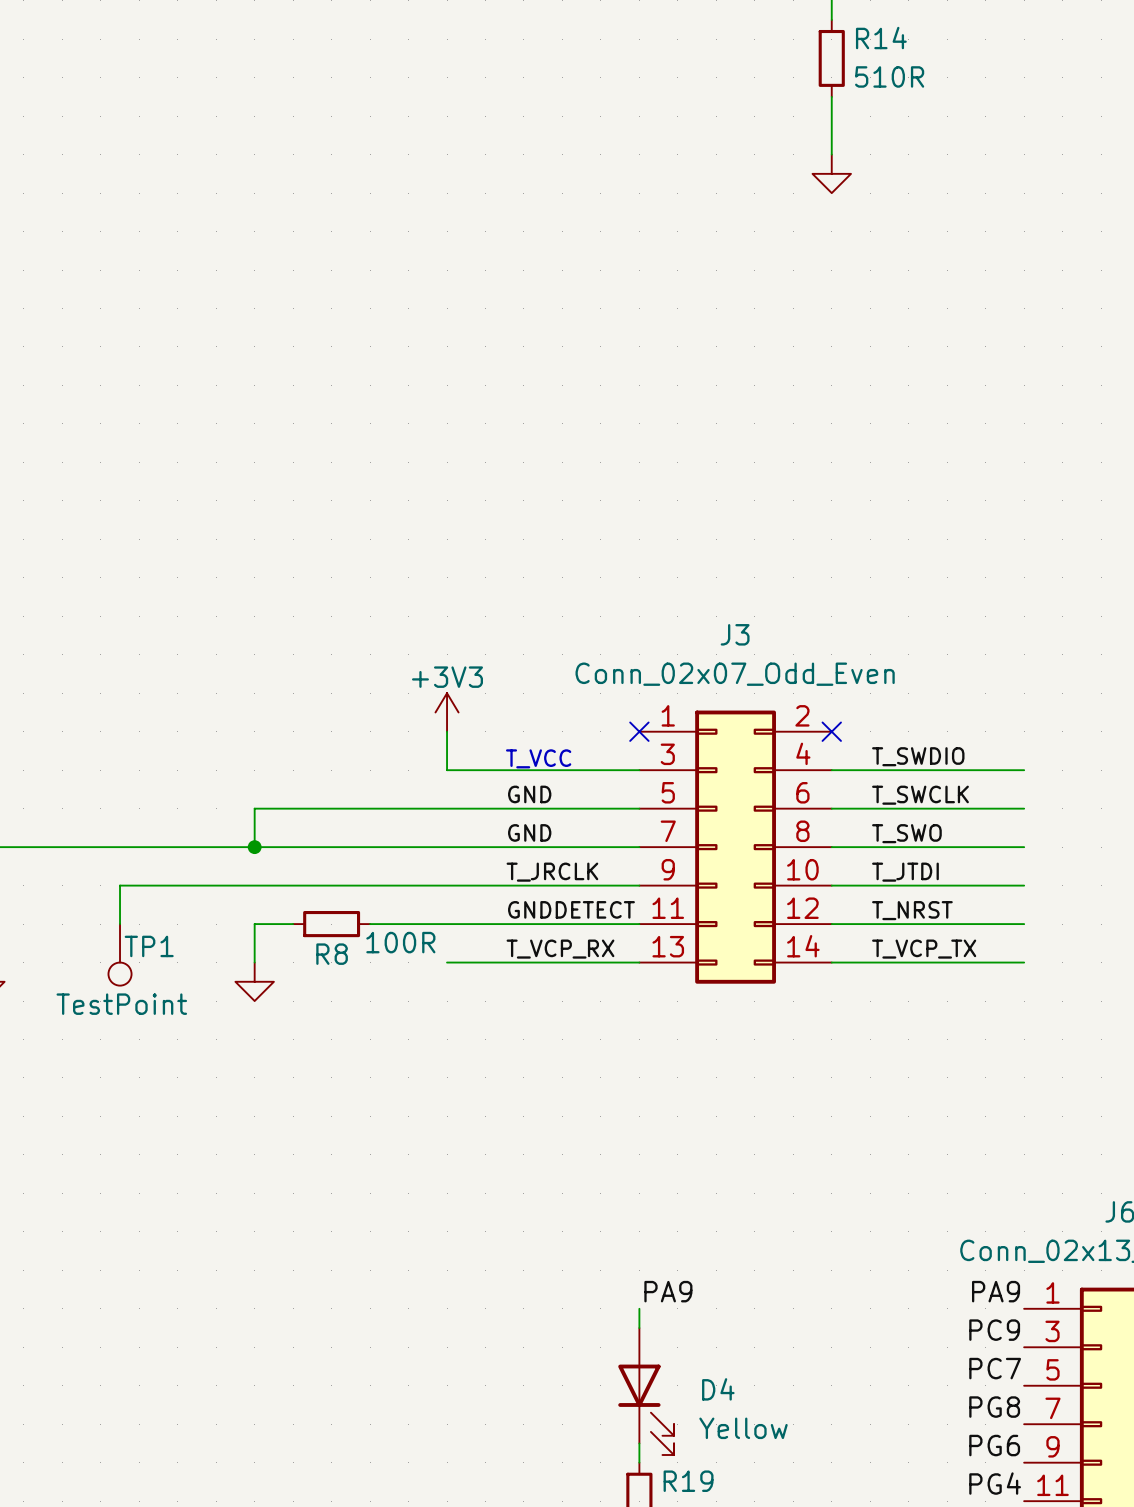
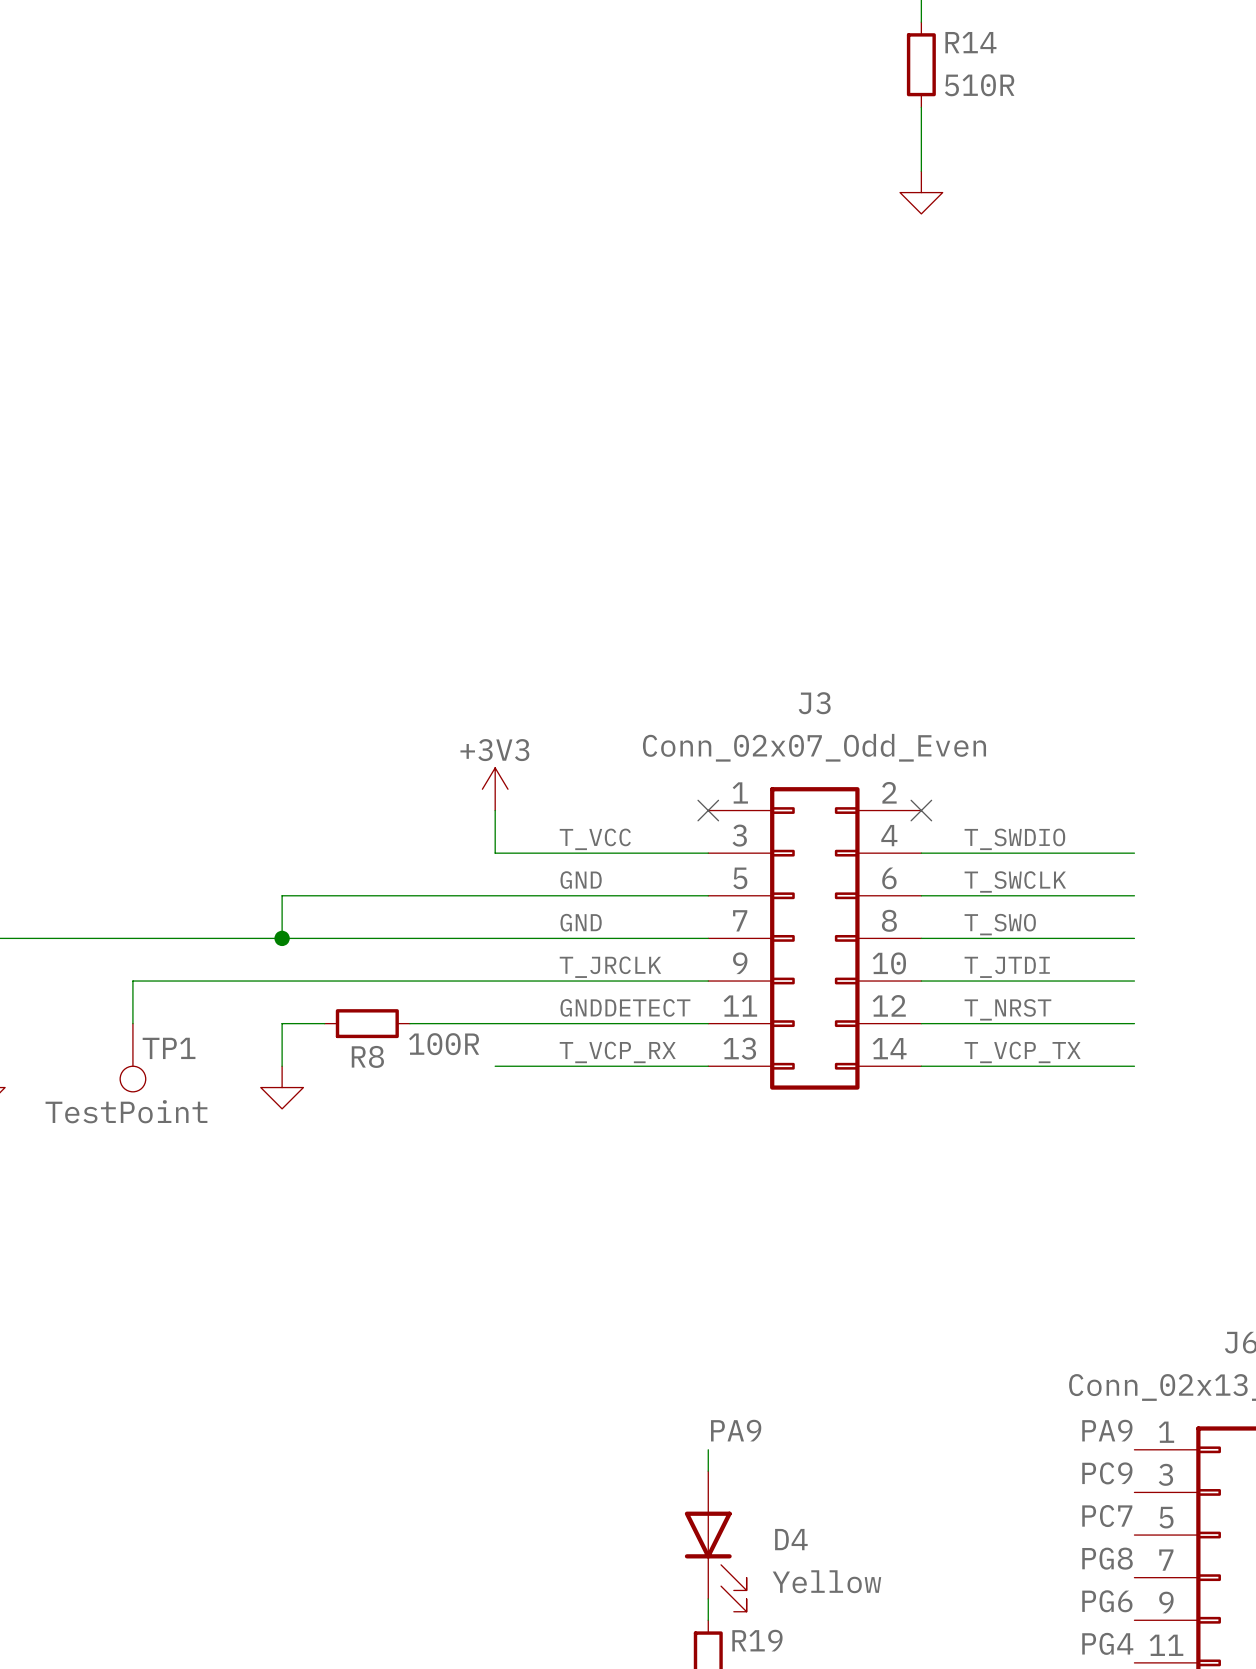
label: none -> T_VCC (595, 839)
text: T_VCC (538, 758) -> none

